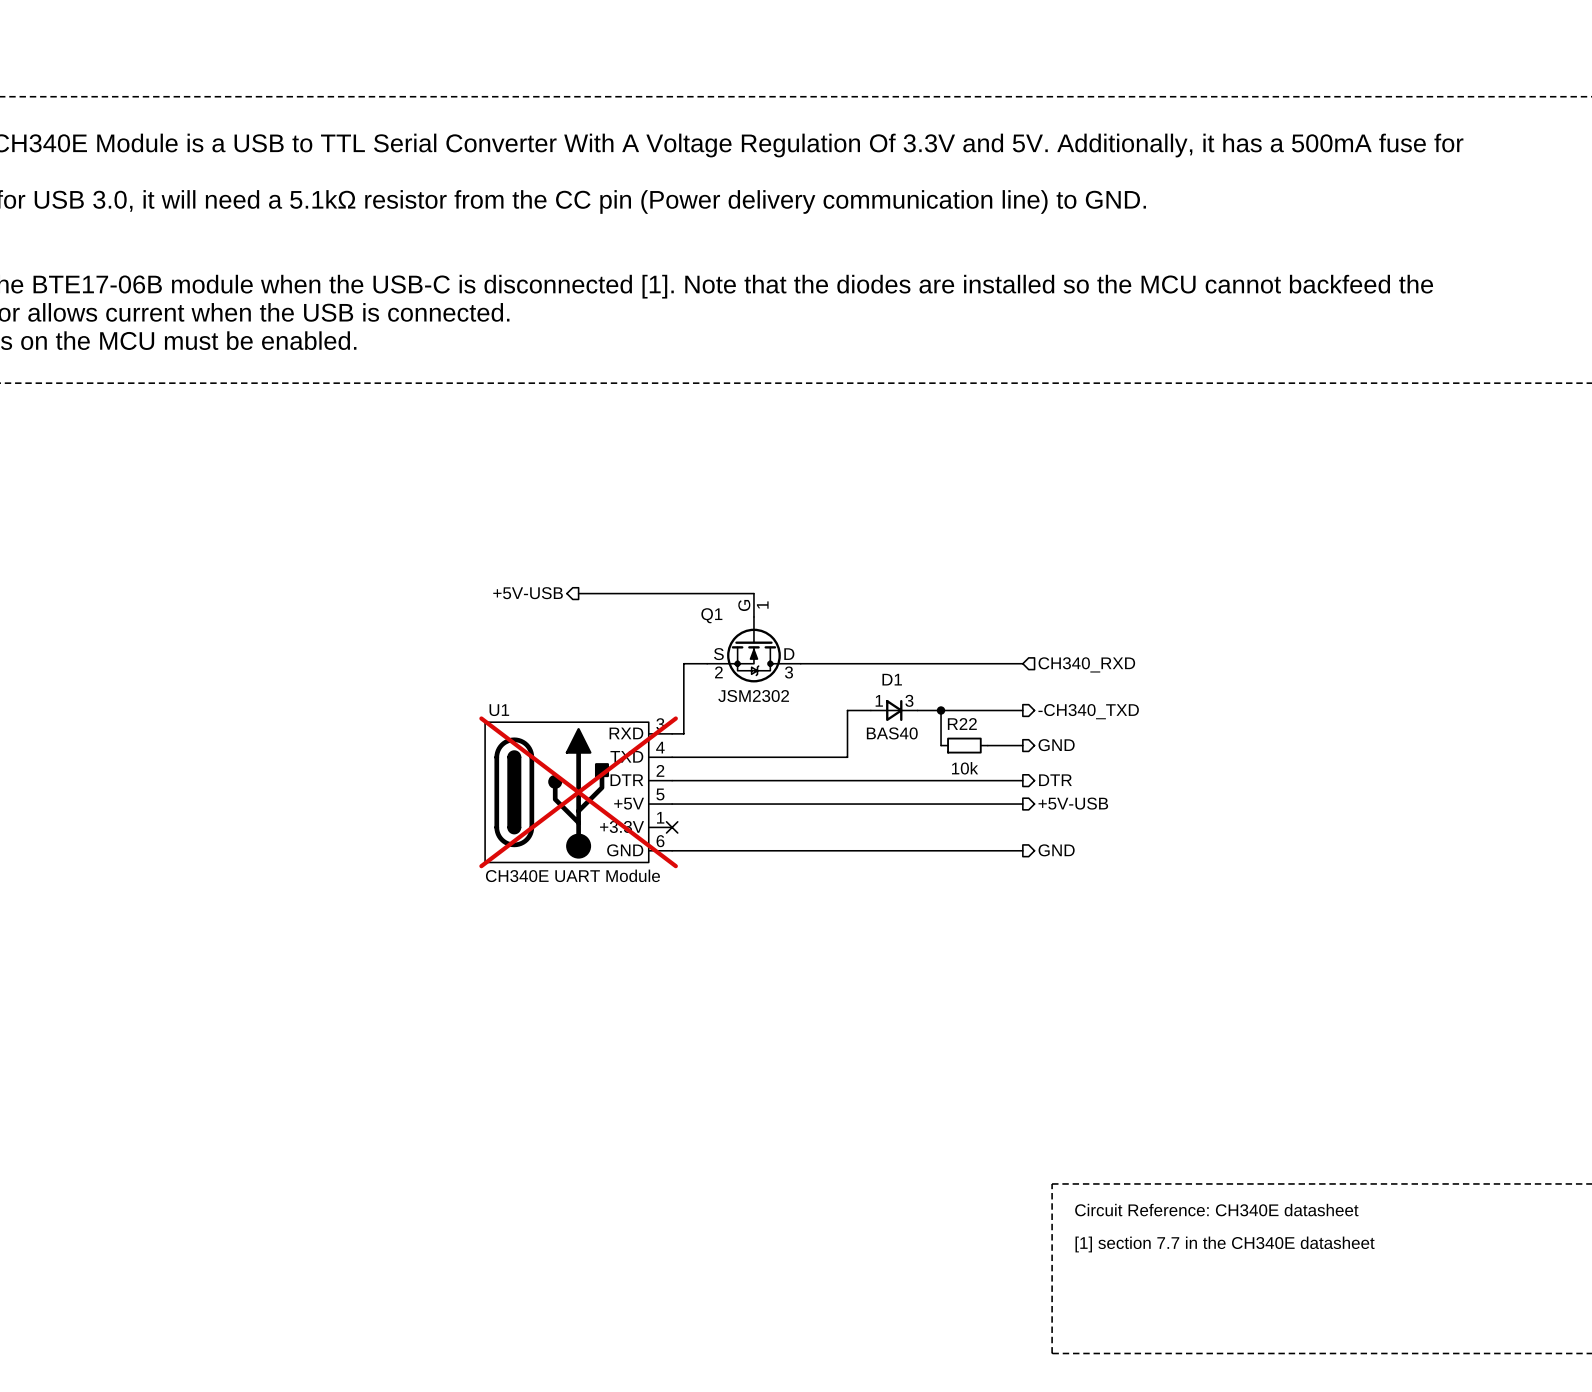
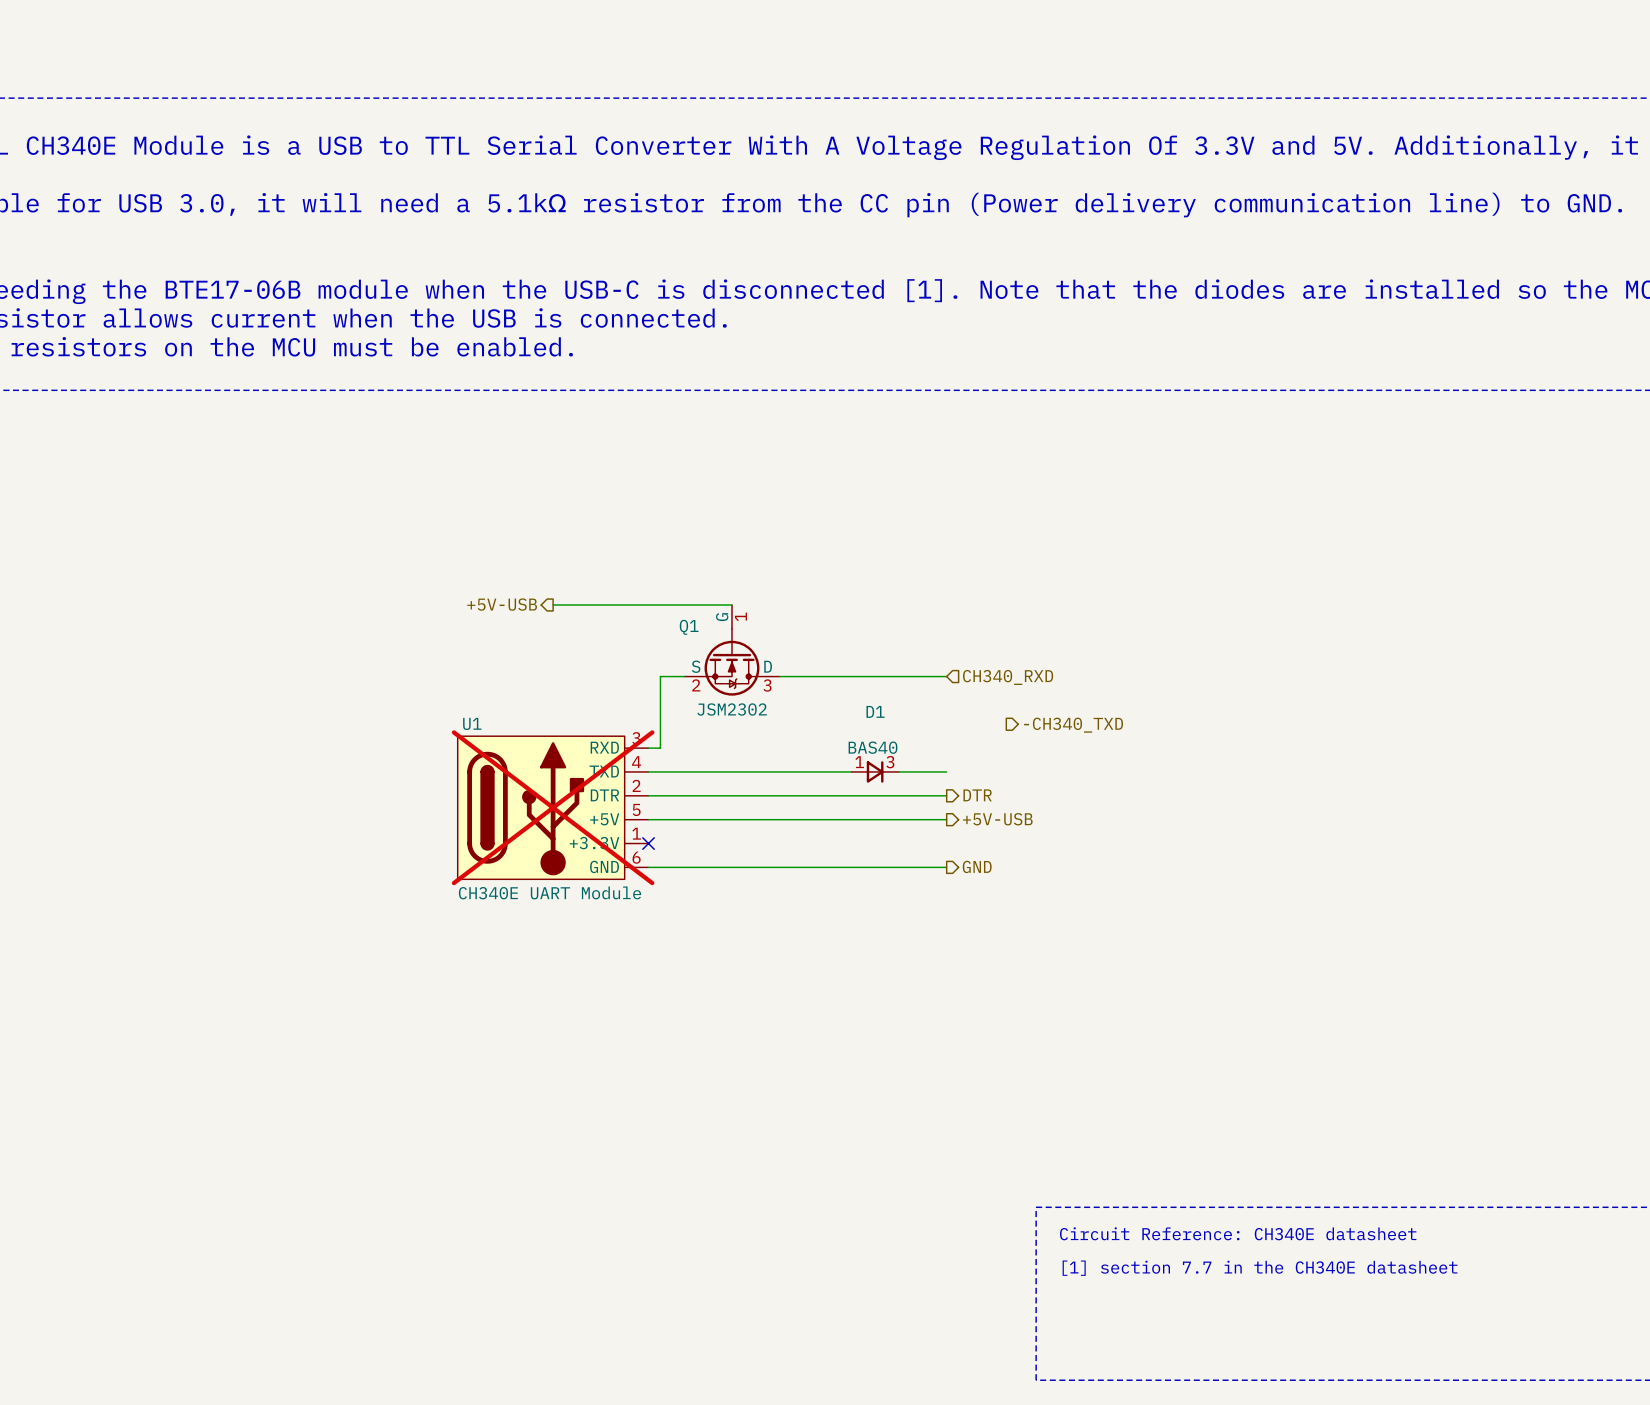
wire: (964, 663) (1022, 663) -> none
hierarchical label position: CH340_RXD (1086, 664) -> CH340_RXD (1008, 677)
D1 name position: D1 (892, 679) -> D1 (875, 711)
wire: (870, 710) (847, 710) (847, 757) -> (851, 771) (827, 771)
D1 position: (894, 710) -> (875, 771)
wire: (917, 710) (1022, 710) -> none
wire: (941, 710) (941, 745) -> none
junction: (941, 710) -> none
R22: 10k (964, 745) -> none
wire: (987, 745) (1022, 745) -> none
hierarchical label: GND (1056, 745) -> none
wire: none -> (898, 771) (946, 771)
wire: (964, 780) (1022, 780) -> none
hierarchical label position: DTR (1055, 780) -> DTR (977, 795)
hierarchical label position: +5V-USB (1073, 803) -> +5V-USB (997, 819)
wire: (964, 804) (1022, 804) -> none
wire: (964, 850) (1022, 850) -> none
hierarchical label position: GND (1056, 850) -> GND (977, 866)

